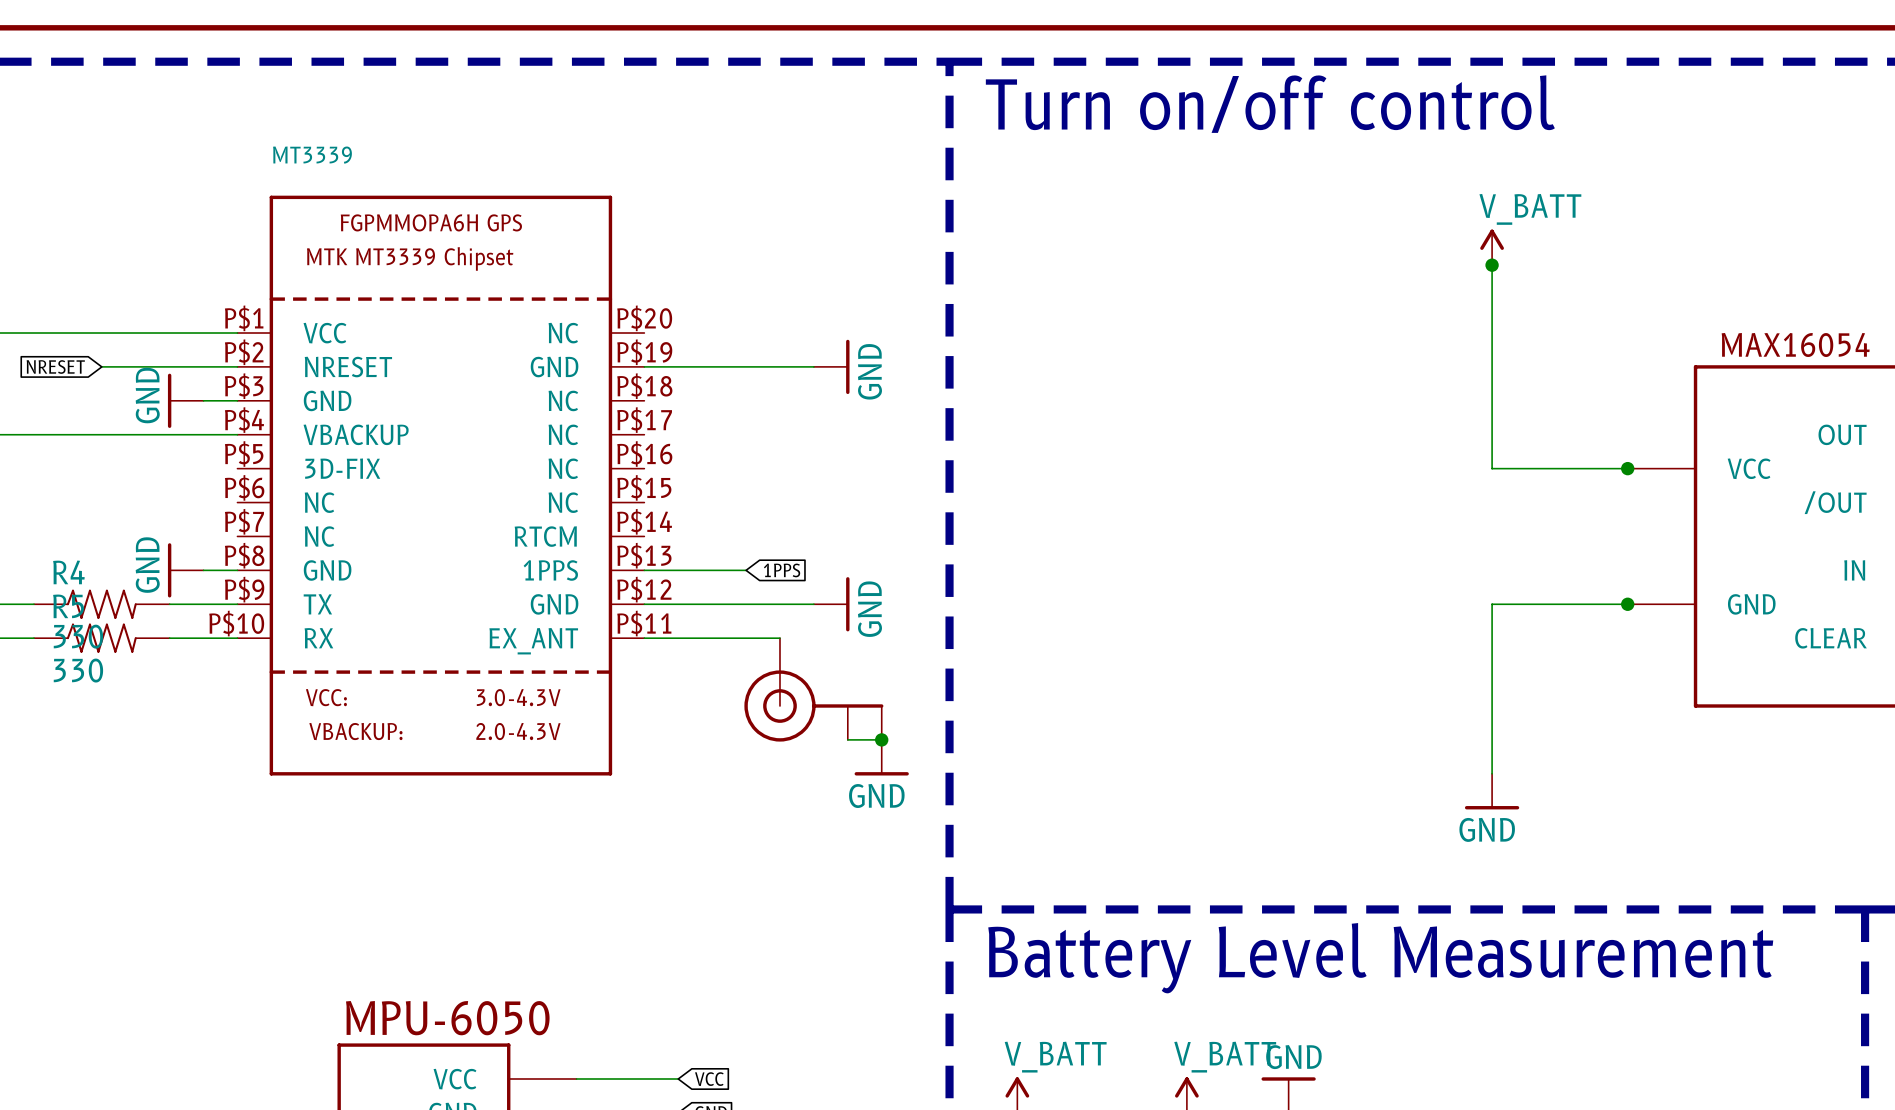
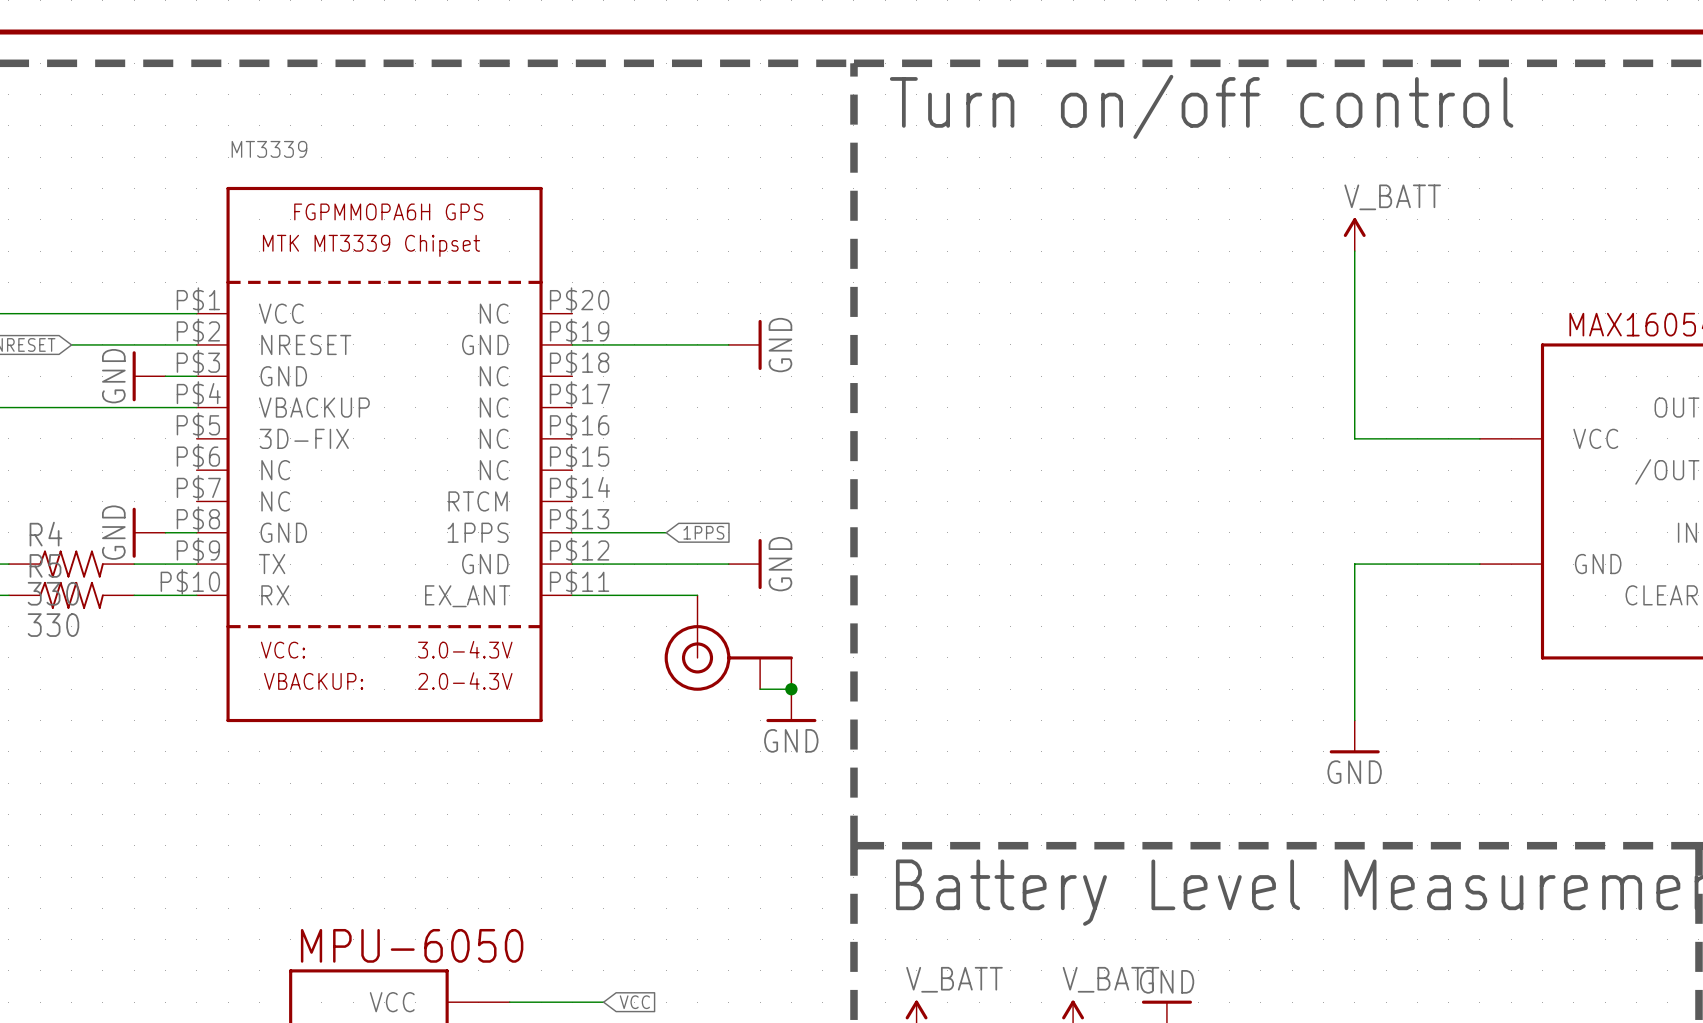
junction: (1492, 265) -> none
junction: (1627, 468) -> none
junction: (1627, 604) -> none

